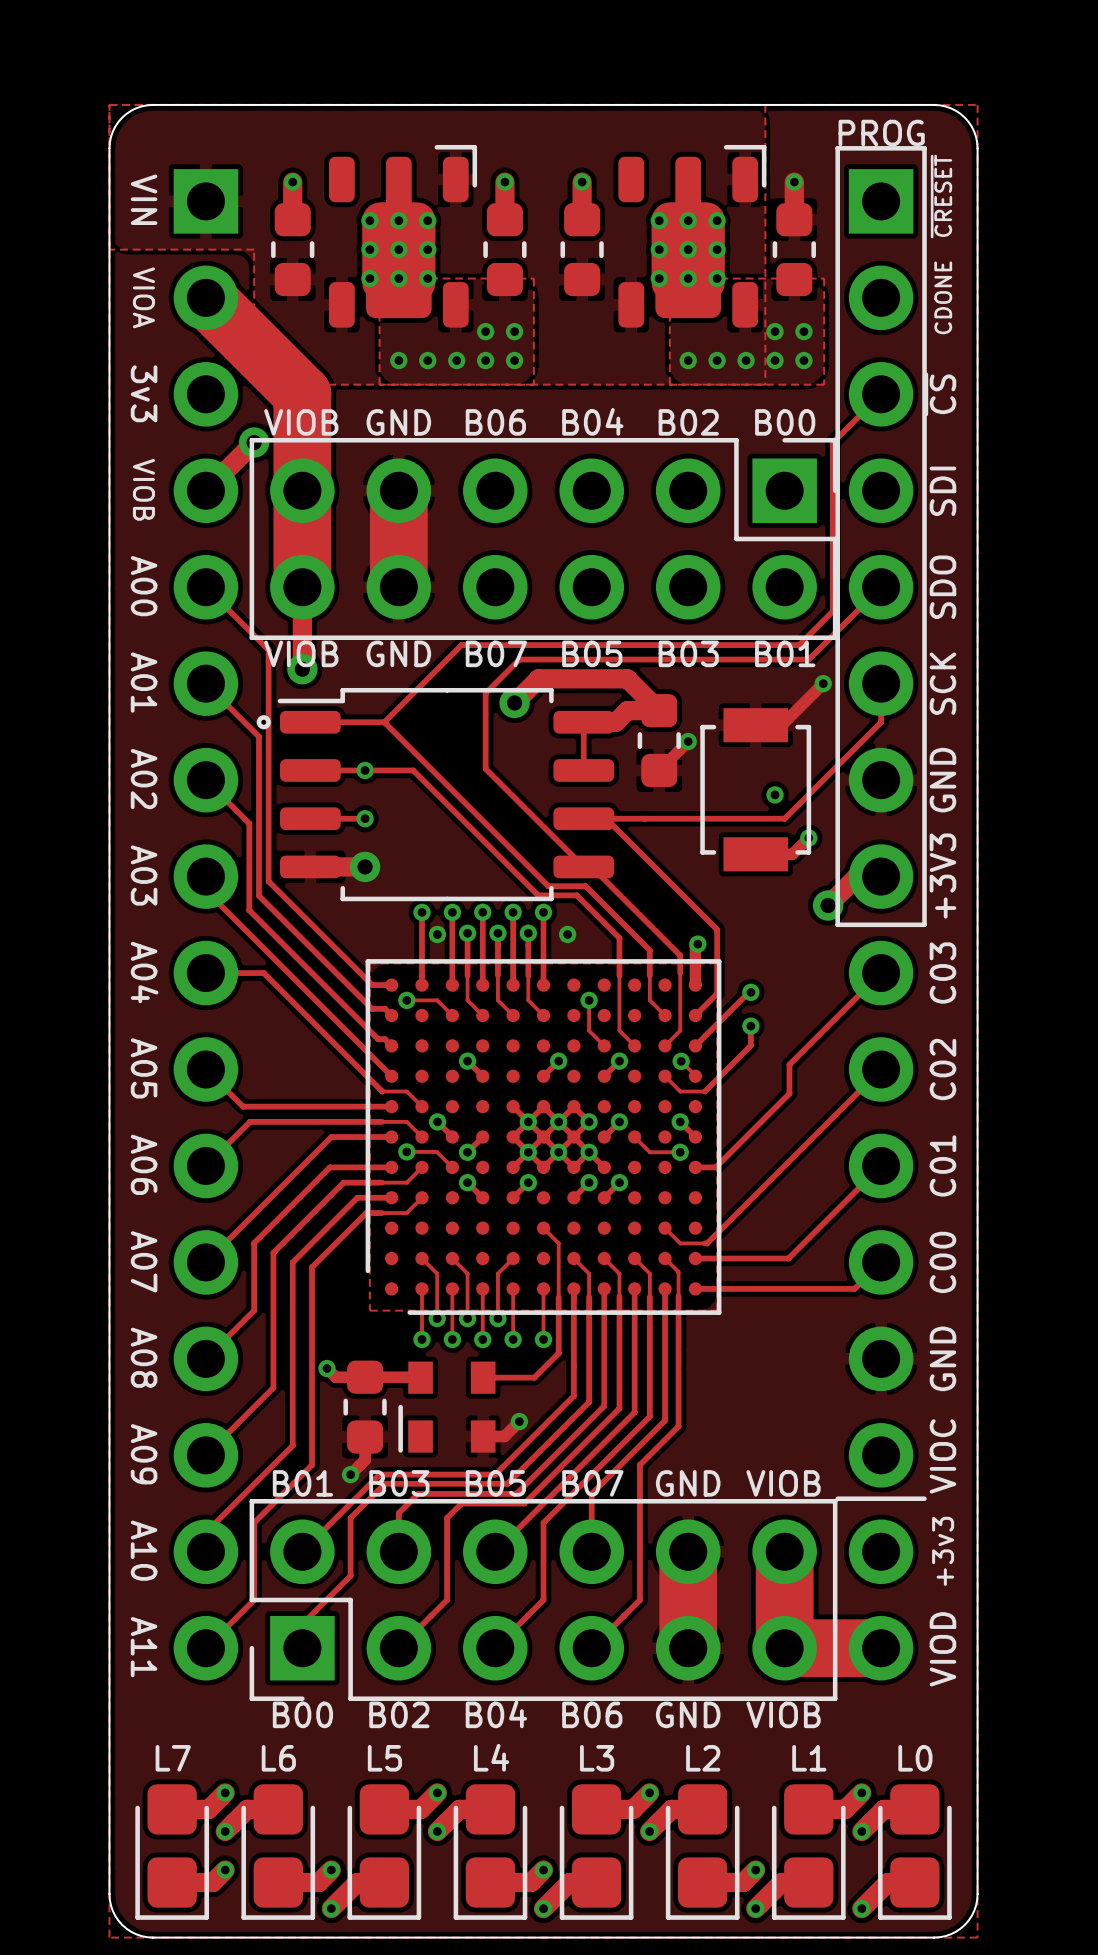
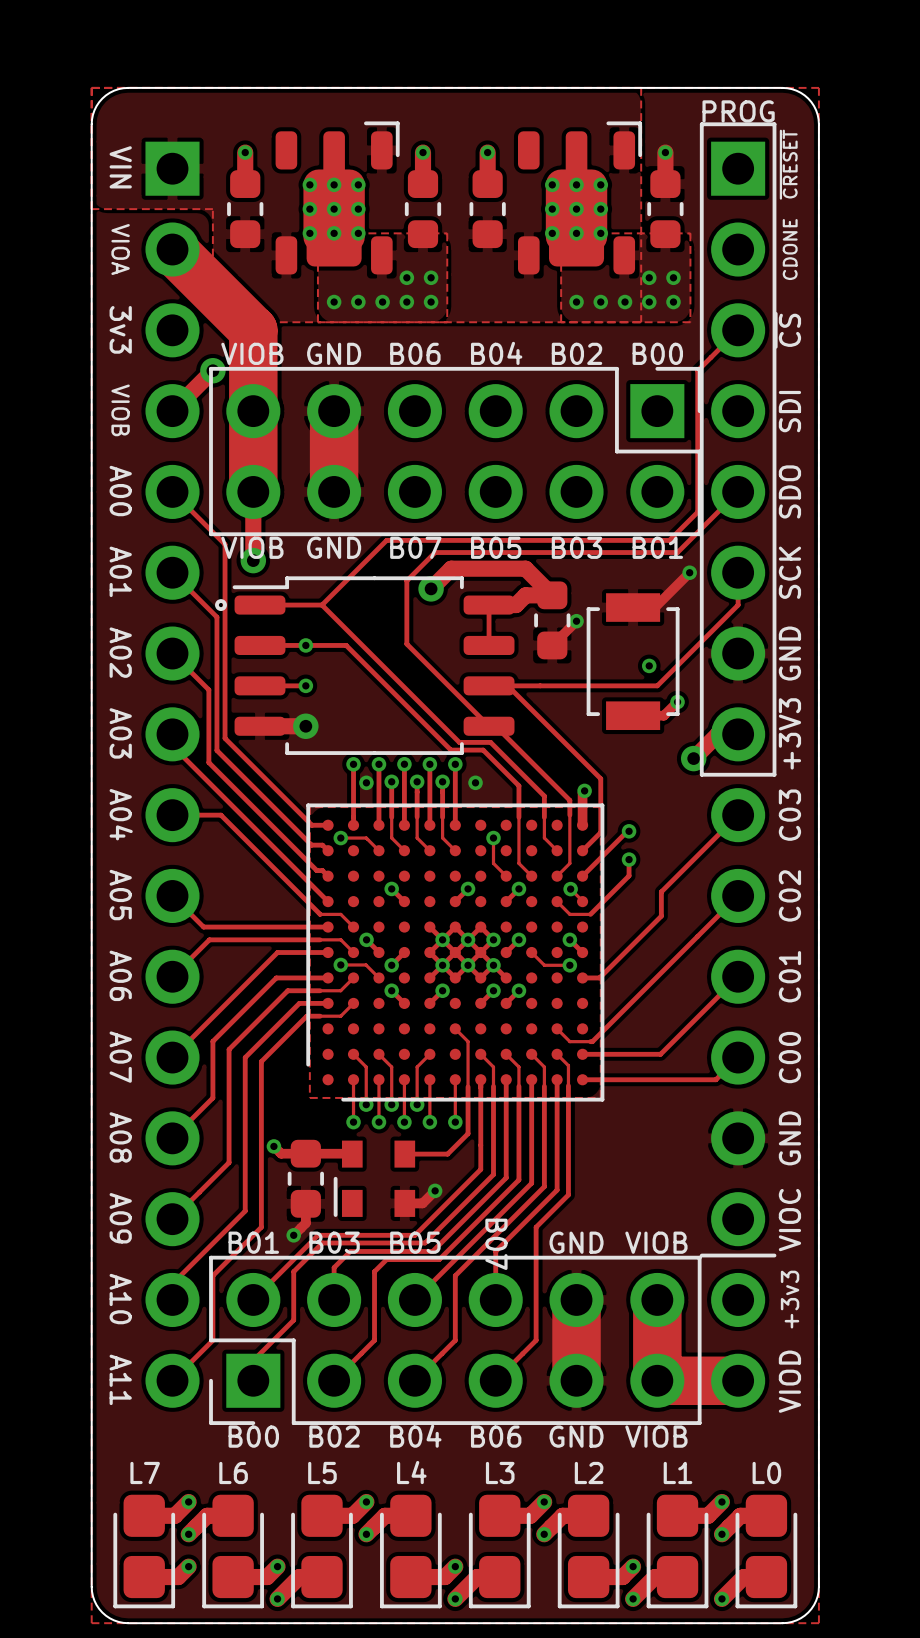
text rotation: 0° (592, 1483) -> 90° clockwise (496, 1244)

